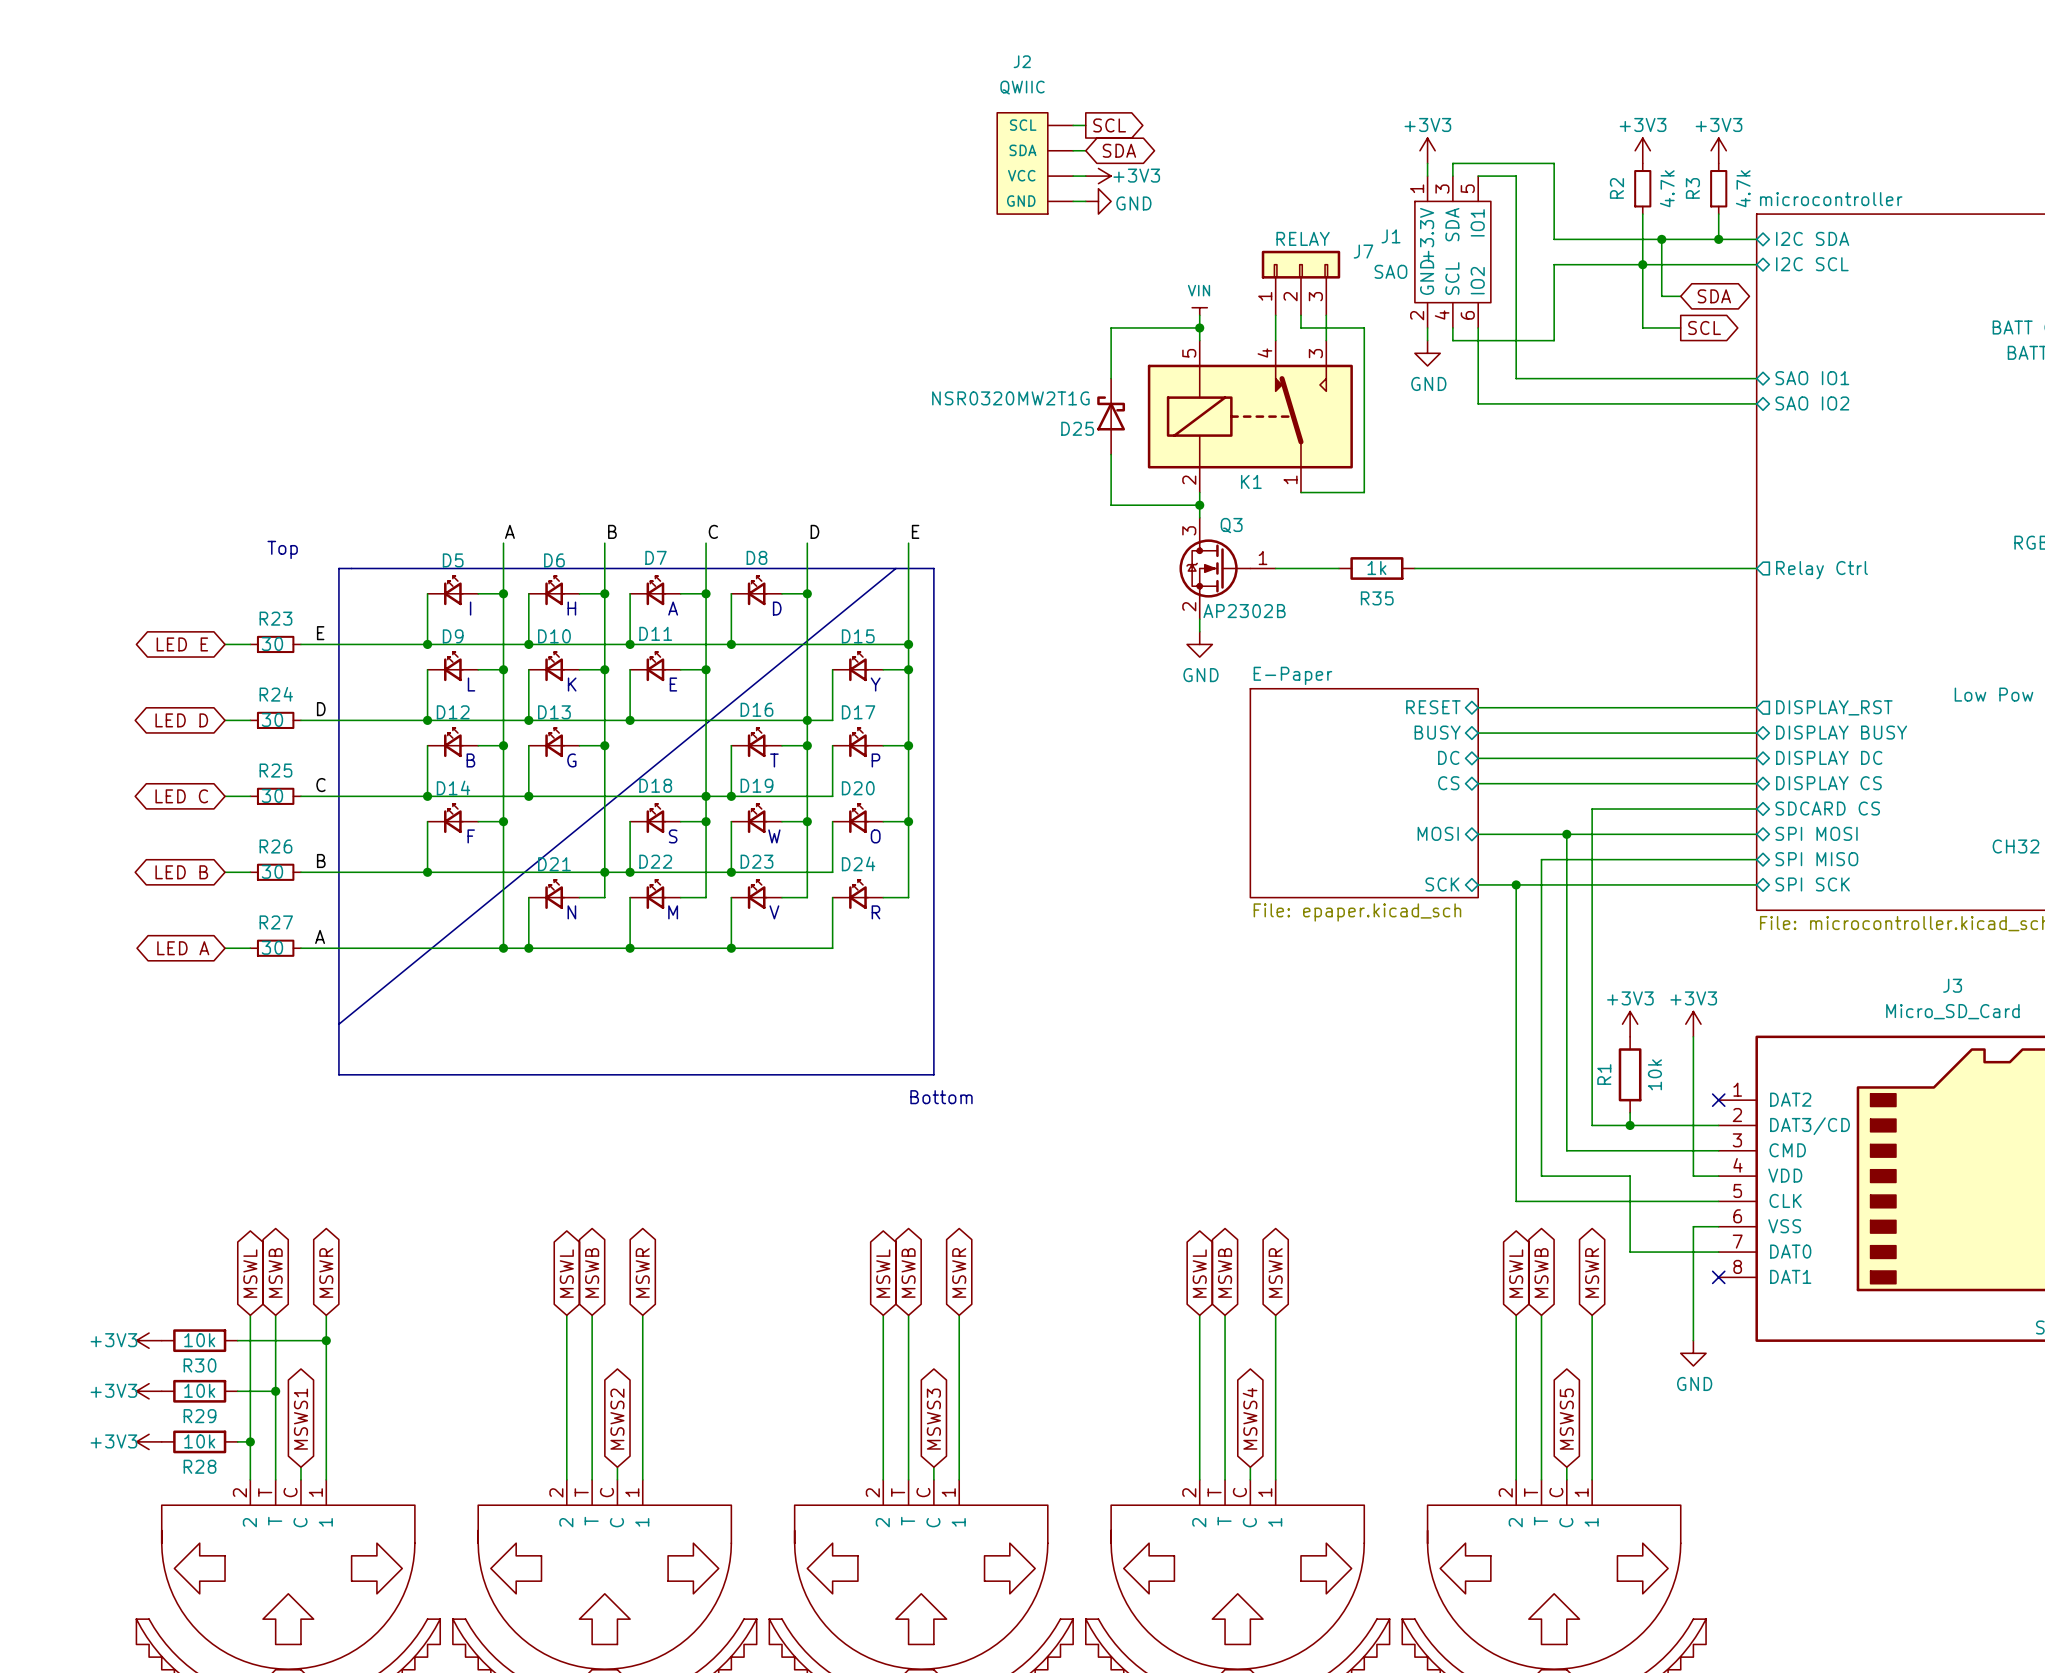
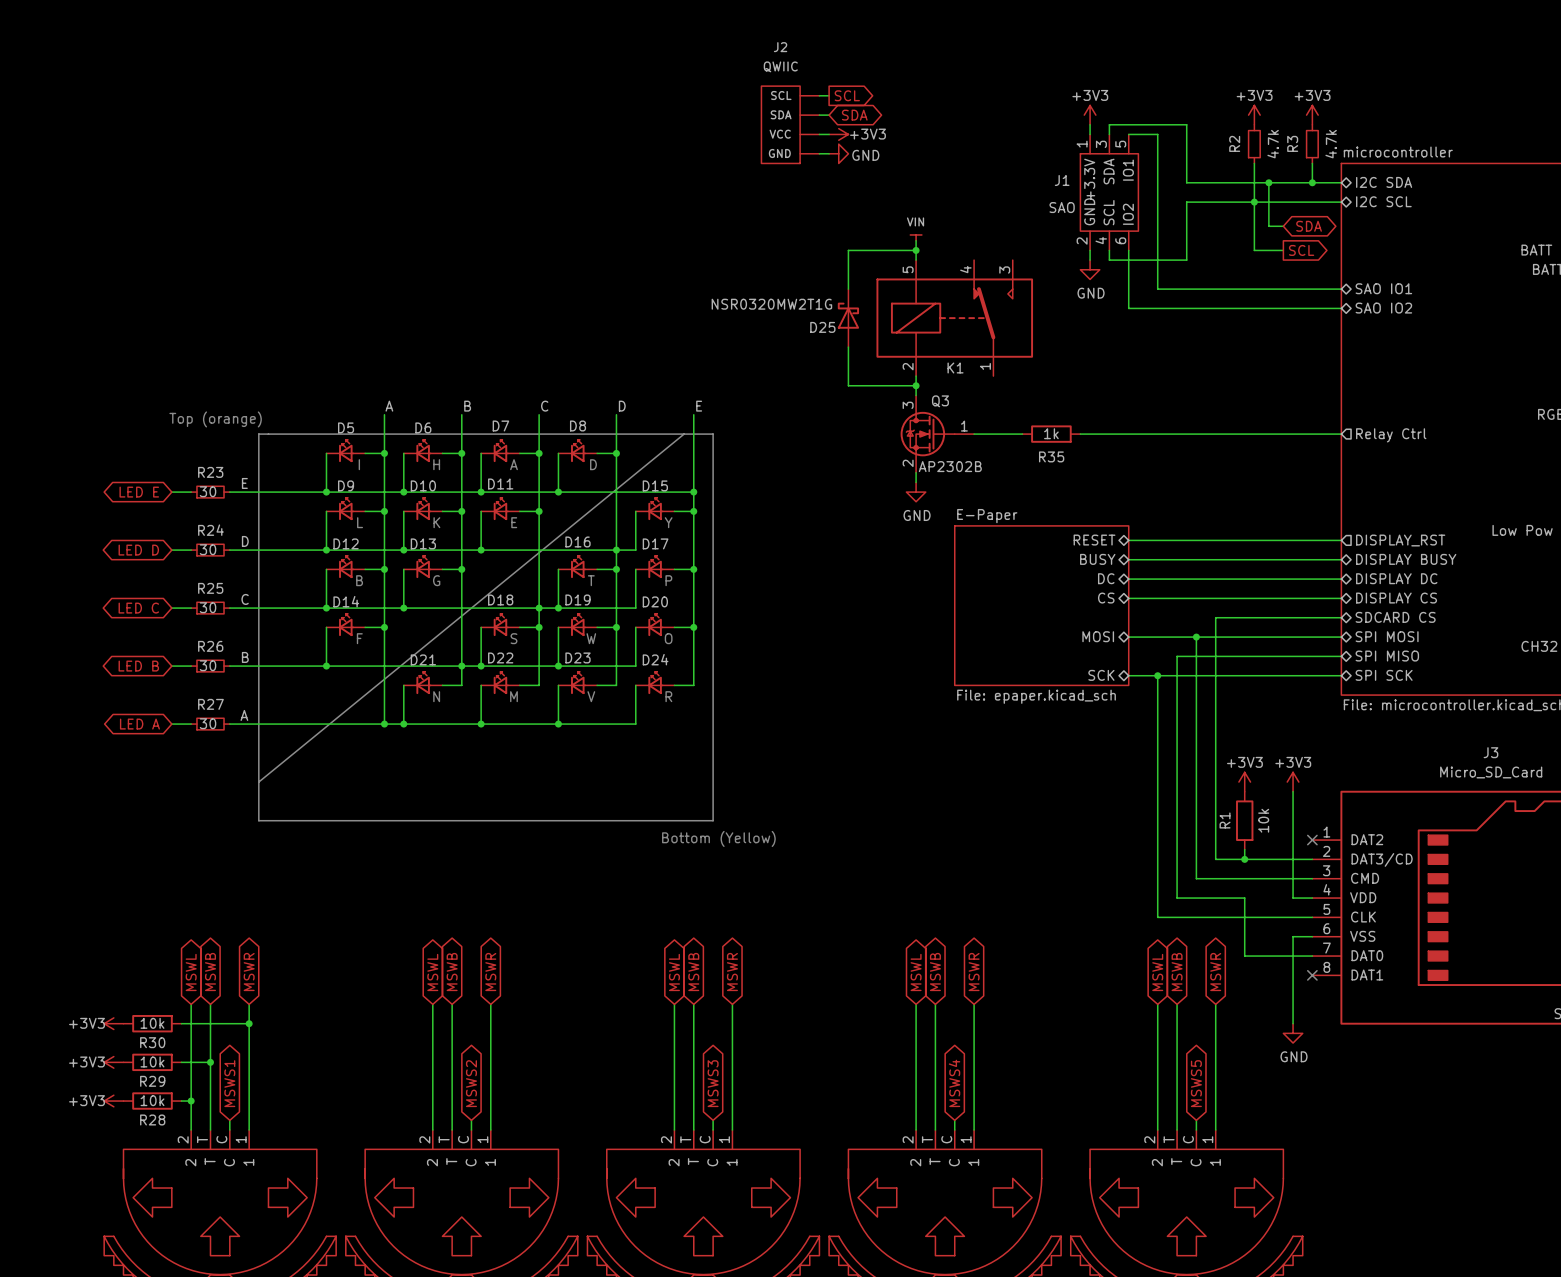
J7: RELAY (1300, 283) -> none
wire: (1275, 315) (1275, 340) -> none
wire: (1300, 315) (1300, 327) (1364, 327) (1364, 492) (1300, 492) -> none
wire: (1326, 315) (1326, 340) -> none
text: Top (282, 549) -> Top (orange) (215, 419)
text: Bottom (941, 1097) -> Bottom (Yellow) (718, 838)

